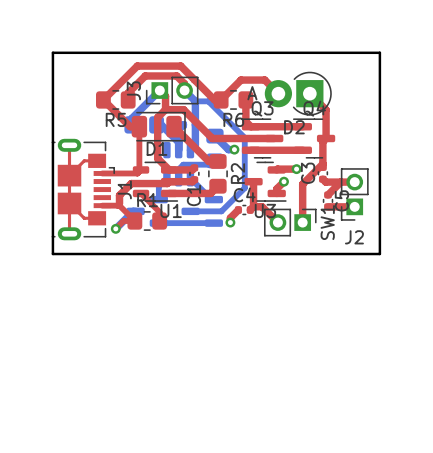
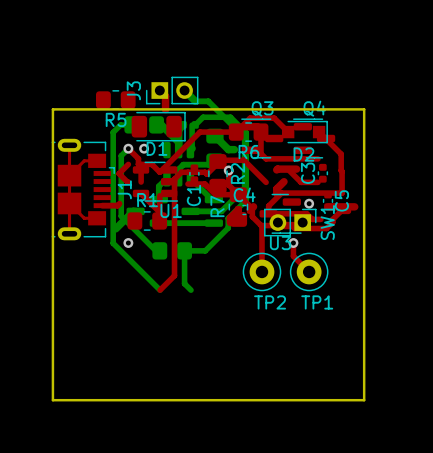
D2 footprint: [264, 71, 332, 116] -> [281, 120, 328, 144]
bottom track: (159, 90) (131, 118) (131, 124) -> none
top track: (184, 90) (184, 83) (176, 75) (145, 75) (128, 93) (128, 99) -> none
top track: (278, 93) (264, 80) (241, 80) (221, 99) (214, 99) (180, 66) (137, 66) (103, 99) -> none
top track: (309, 93) (326, 109) (326, 138) (322, 141) (322, 167) -> none
R6 position: (233, 99) -> (248, 132)
top track: (245, 99) (245, 121) (250, 126) (302, 126) -> (260, 132) (260, 153) (266, 158) (317, 158)
top track: (103, 101) (130, 126) (139, 126) (139, 171) -> none
bottom track: (195, 101) (195, 145) (192, 148) -> (192, 125) (192, 148)
board edge: (52, 109) (52, 52) (379, 52) (379, 254) (52, 254) -> (52, 109) (364, 109) (364, 400) (52, 400) (52, 254)
bottom track: none -> (139, 125) (120, 125) (113, 132) (113, 243) (160, 290)
bottom track: none -> (195, 125) (203, 117) (230, 117) (246, 132) (246, 200) (228, 218) (228, 227) (205, 250) (184, 250) (184, 283) (191, 290)
top track: (174, 126) (208, 161) (217, 161) -> none
top track: none -> (288, 132) (274, 118) (250, 118) (236, 132) (200, 132) (159, 172) (151, 164) (138, 164)
top track: none -> (319, 132) (341, 154) (342, 193) (281, 193) (268, 206) (268, 213) (306, 213) (312, 219) (320, 219)
top track: (274, 138) (212, 138) (183, 109) (165, 109) (157, 117) (157, 158) (169, 169) (192, 169) (194, 167) -> none
top track: none -> (128, 148) (138, 158) (138, 164)
bottom track: none -> (128, 148) (121, 155) (121, 216) (155, 250) (159, 250)
via: none -> (128, 148)
via: none -> (144, 148)
via position: (234, 149) -> (228, 170)
top track: (250, 150) (302, 150) -> none
top track: (322, 163) (302, 184) (302, 222) -> none
top track: none -> (128, 164) (119, 173) (128, 182)
top track: none -> (138, 164) (141, 167) (141, 182)
top track: (141, 169) (137, 173) (102, 173) -> none
via: (296, 169) -> none
top track: none -> (228, 170) (228, 185) (252, 208) (252, 216) (261, 226) (261, 271)
top track: none -> (289, 170) (301, 182) (317, 182)
top track: (194, 179) (192, 181) (169, 181) (167, 183) (131, 183) (119, 195) (119, 205) (134, 221) (123, 221) (115, 228) -> none
top track: (322, 179) (325, 182) (354, 182) -> none
top track: (253, 181) (253, 206) (262, 206) (277, 222) -> none
U3 position: (265, 181) -> (280, 213)
via: (284, 181) -> none
top track: none -> (266, 182) (243, 160) (220, 160) (206, 174) (205, 172) (181, 172) (174, 179) (174, 275) (160, 290)
top track: (340, 182) (328, 194) -> none
top track: none -> (187, 184) (204, 184) (215, 194) (238, 194)
top track: (217, 186) (210, 193) (169, 193) -> none
J2: (354, 194) -> none
top track: none -> (159, 195) (160, 219)
via: none -> (309, 203)
R7: none -> (238, 207)
top track: none -> (348, 211) (340, 211) (326, 228) (261, 225)
via: (230, 222) -> none
via position: (115, 228) -> (128, 243)
top track: none -> (293, 243) (293, 256) (309, 271)
via: none -> (293, 243)
part: none -> (172, 250)
TP2: none -> (261, 271)
TP1: none -> (309, 271)

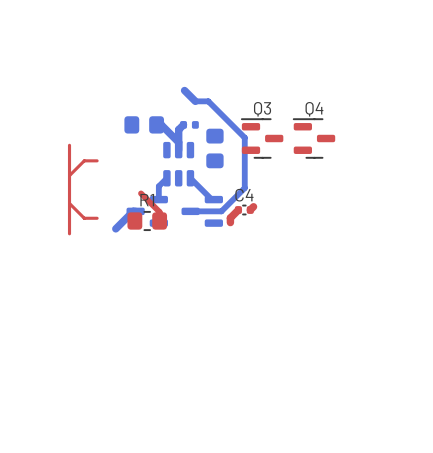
top track: (159, 90) (165, 96) (165, 109) -> none
J3: (172, 90) -> none
R5: (115, 99) -> none
board edge: (52, 109) (364, 109) (364, 400) (52, 400) (52, 109) -> none
bottom track: (139, 125) (120, 125) (113, 132) (113, 243) (160, 290) -> none
bottom track: (192, 125) (192, 148) (190, 150) -> none
bottom track: (195, 125) (203, 117) (230, 117) (246, 132) (246, 200) (228, 218) (228, 227) (205, 250) (184, 250) (184, 283) (191, 290) -> none
D1: (158, 126) -> none
R6: (248, 132) -> none
top track: (260, 132) (260, 153) (266, 158) (317, 158) -> none
top track: (288, 132) (274, 118) (250, 118) (236, 132) (200, 132) (159, 172) (151, 164) (138, 164) -> none
D2: (304, 132) -> none
top track: (319, 132) (341, 154) (342, 193) (281, 193) (268, 206) (268, 213) (306, 213) (312, 219) (320, 219) -> none
bottom track: (214, 136) (228, 149) (234, 149) -> none
top track: (128, 148) (138, 158) (138, 164) -> none
bottom track: (128, 148) (121, 155) (121, 216) (155, 250) (159, 250) -> none
via: (128, 148) -> none
via: (144, 148) -> none
bottom track: (214, 160) (211, 164) (183, 164) (178, 169) (178, 178) -> none
top track: (128, 164) (119, 173) (128, 182) -> none
top track: (138, 164) (141, 167) (141, 182) -> none
top track: (296, 169) (276, 169) -> none
top track: (228, 170) (228, 185) (252, 208) (252, 216) (261, 226) (261, 271) -> none
via: (228, 170) -> none
top track: (289, 170) (301, 182) (317, 182) -> none
C1: (194, 173) -> none
R2: (217, 173) -> none
C3: (322, 173) -> none
U1: (155, 181) -> none
top track: (284, 181) (276, 188) (276, 193) -> none
top track: (266, 182) (243, 160) (220, 160) (206, 174) (205, 172) (181, 172) (174, 179) (174, 275) (160, 290) -> none
top track: (187, 184) (204, 184) (215, 194) (238, 194) -> none
J1: (83, 189) -> none
top track: (159, 195) (160, 219) -> none
C5: (328, 200) -> none
top track: (119, 203) (117, 205) (102, 205) -> none
via: (309, 203) -> none
top track: (328, 206) (354, 206) -> none
R7: (238, 207) -> none
top track: (348, 211) (340, 211) (326, 228) (261, 225) -> none
U3: (280, 213) -> none
SW1: (290, 222) -> none
bottom track: (158, 223) (213, 223) -> none
via: (128, 243) -> none
top track: (293, 243) (293, 256) (309, 271) -> none
via: (293, 243) -> none
part: (172, 250) -> none
TP2: (261, 271) -> none
TP1: (309, 271) -> none

